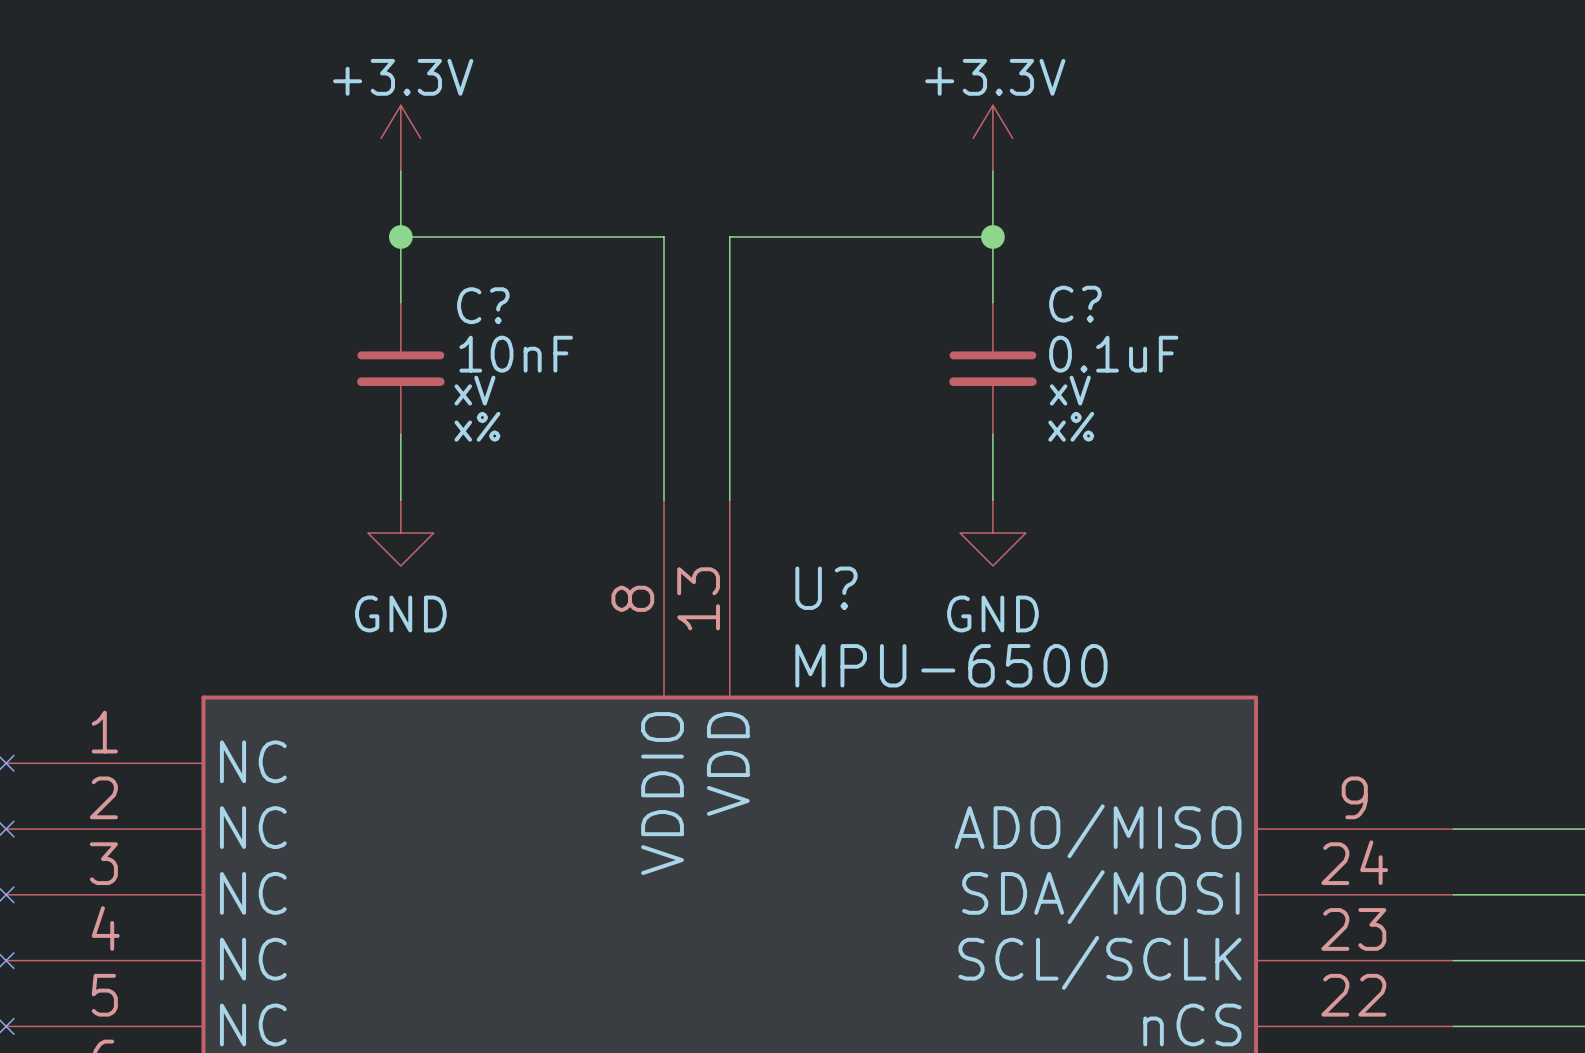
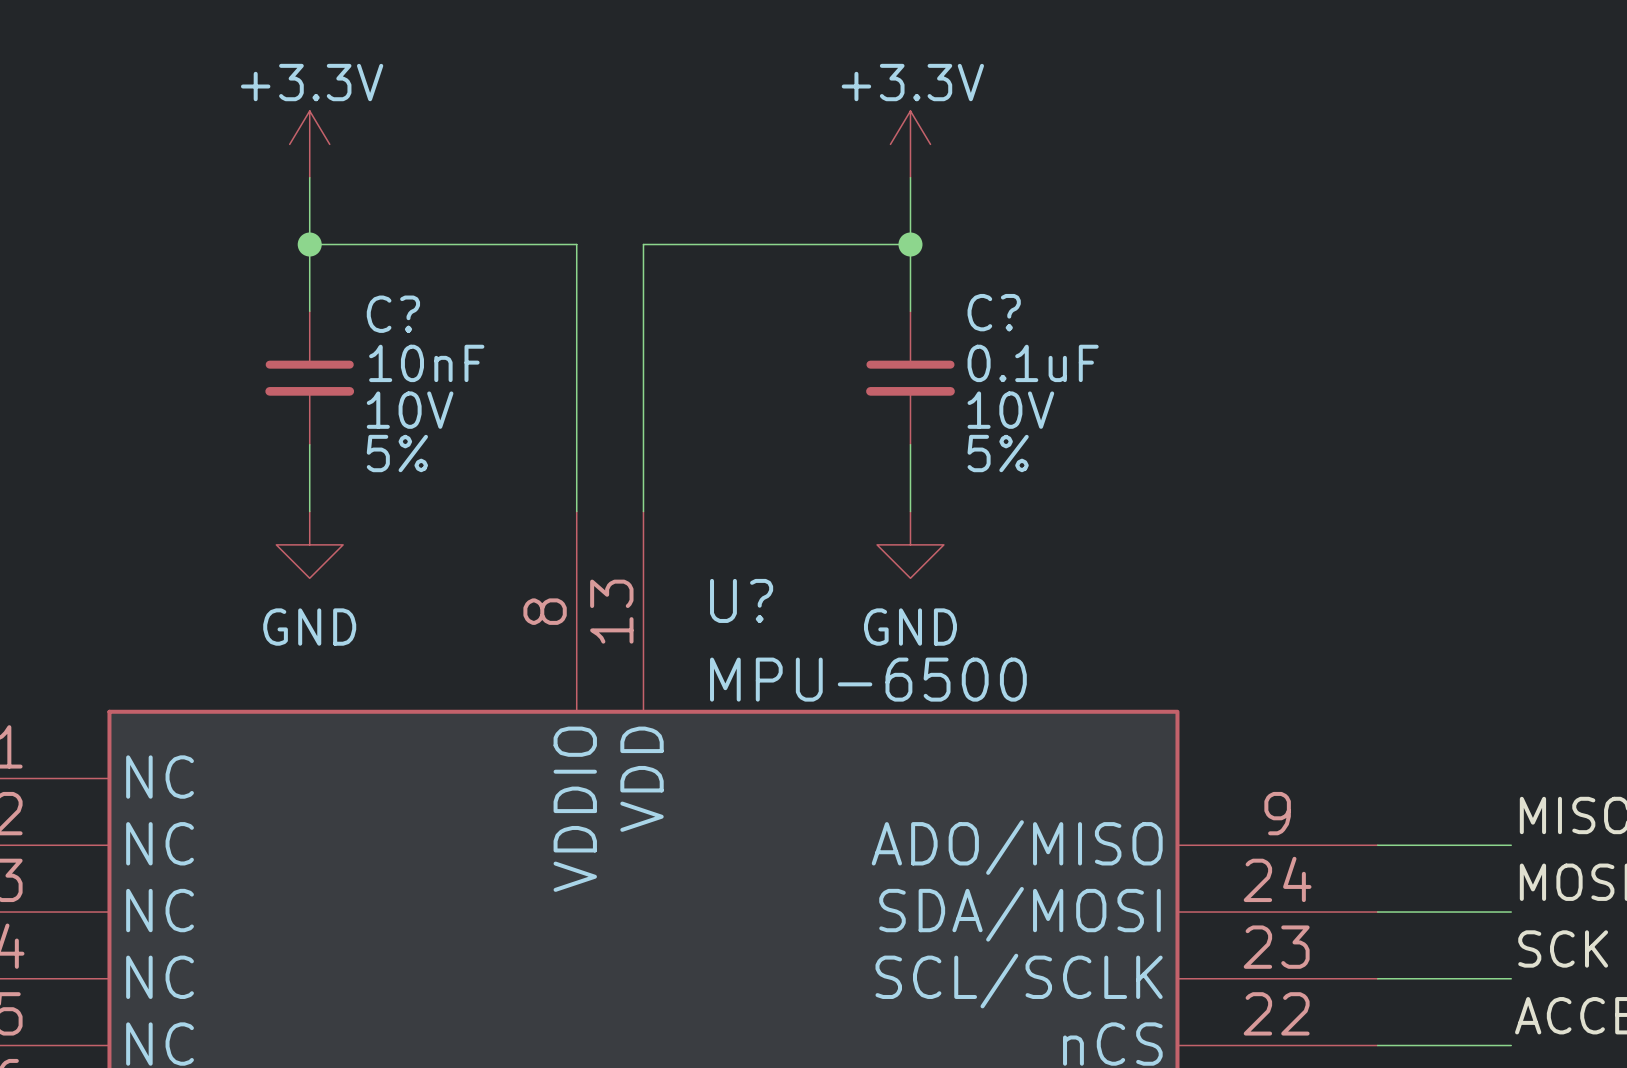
C? text: xV (474, 390) -> 10V (410, 410)
C? text: xV (1070, 390) -> 10V (1010, 410)
C? text: x% (477, 426) -> 5% (397, 453)
C? text: x% (1071, 426) -> 5% (998, 453)

